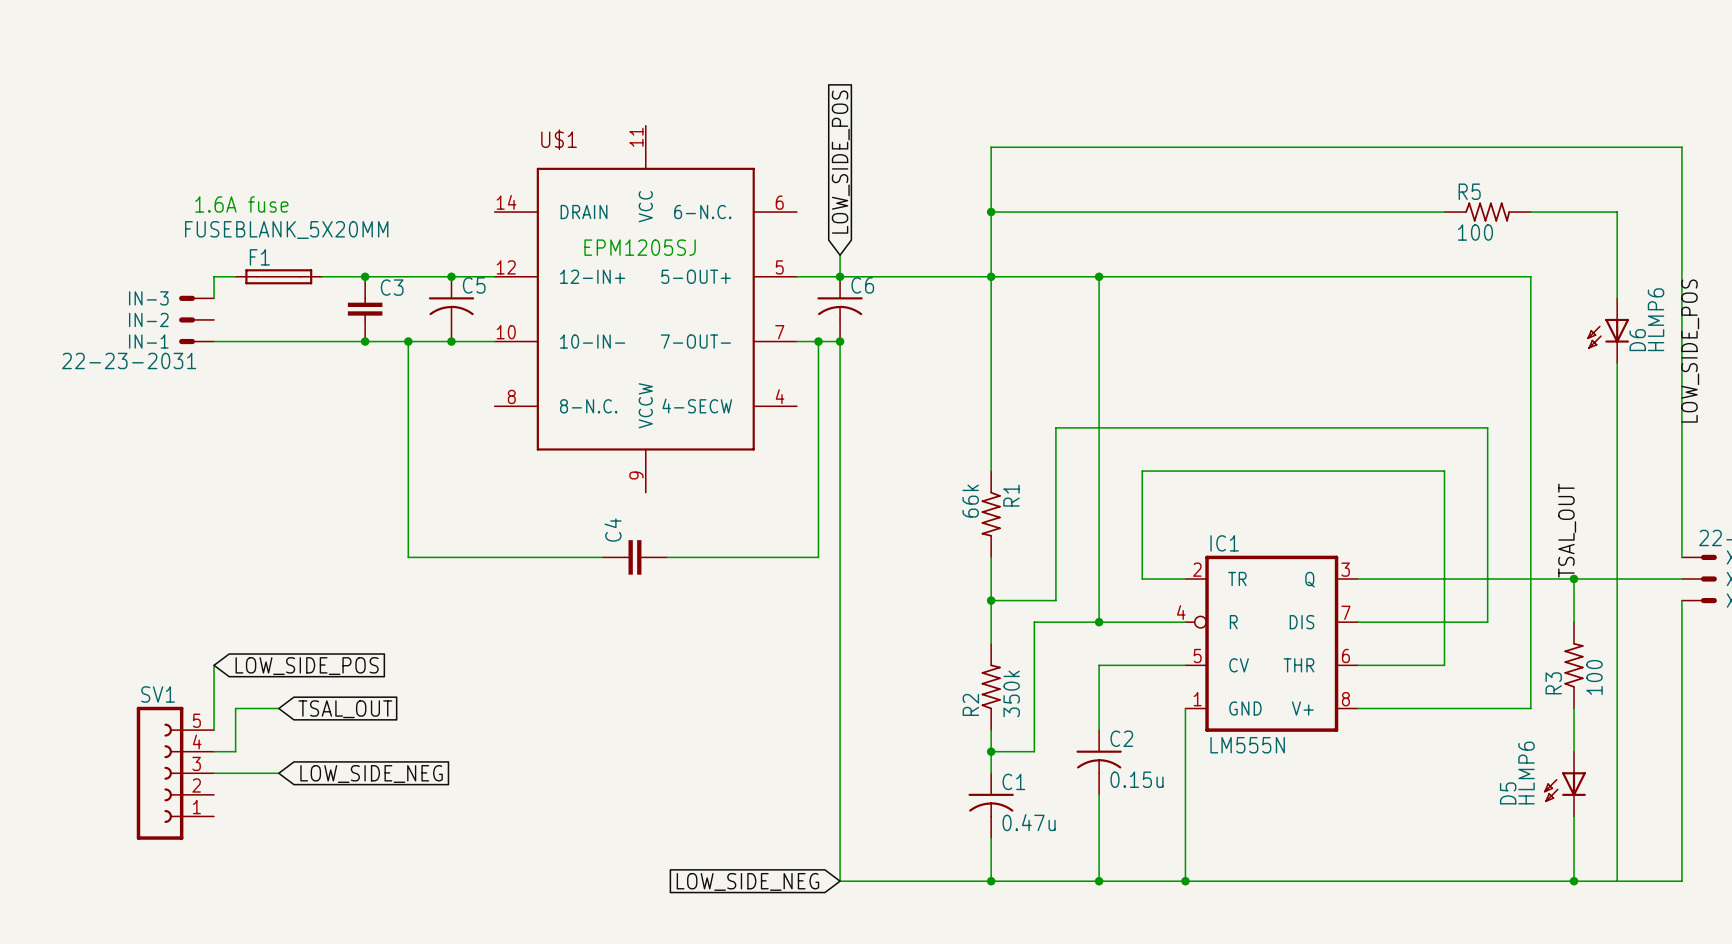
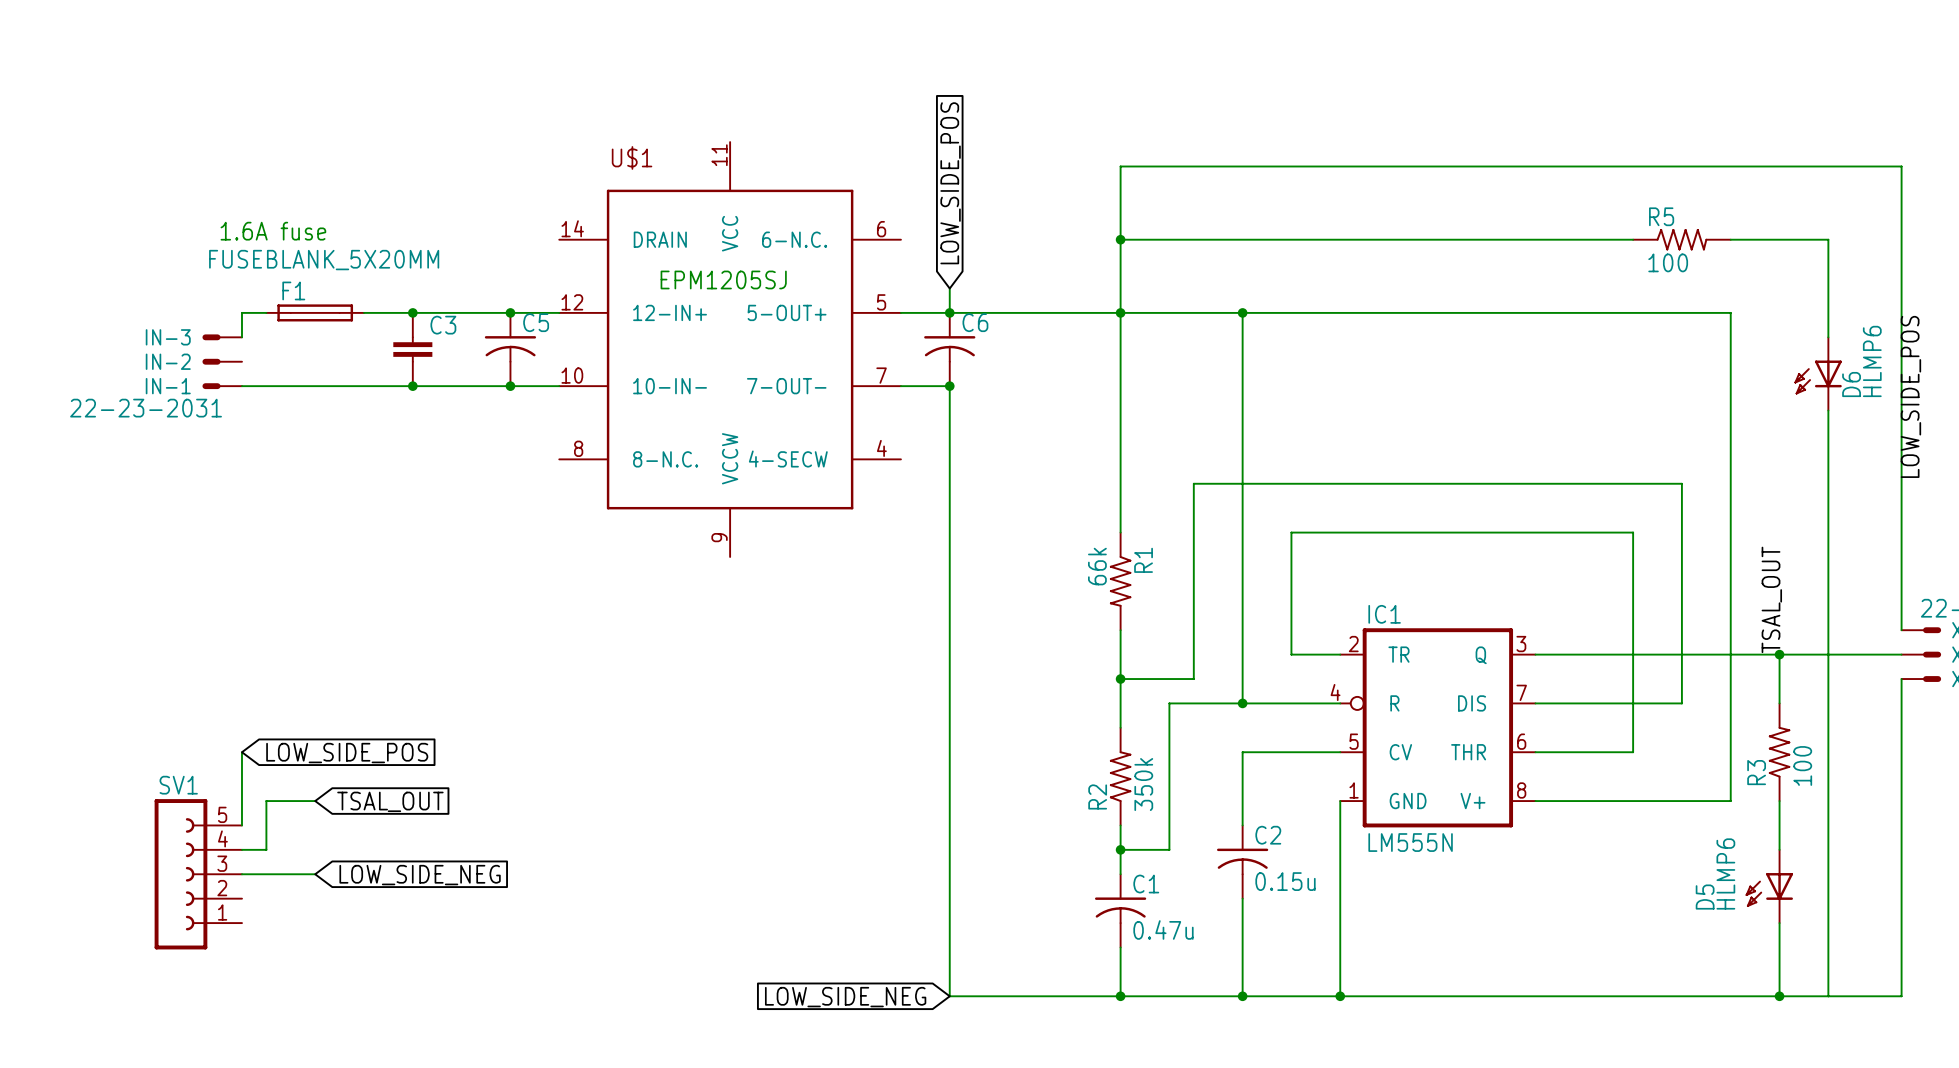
wire: (408, 341) (408, 557) (602, 557) -> none
junction: (408, 341) -> none
wire: (818, 341) (818, 557) (667, 557) -> none
junction: (818, 341) -> none
C4: (634, 557) -> none

